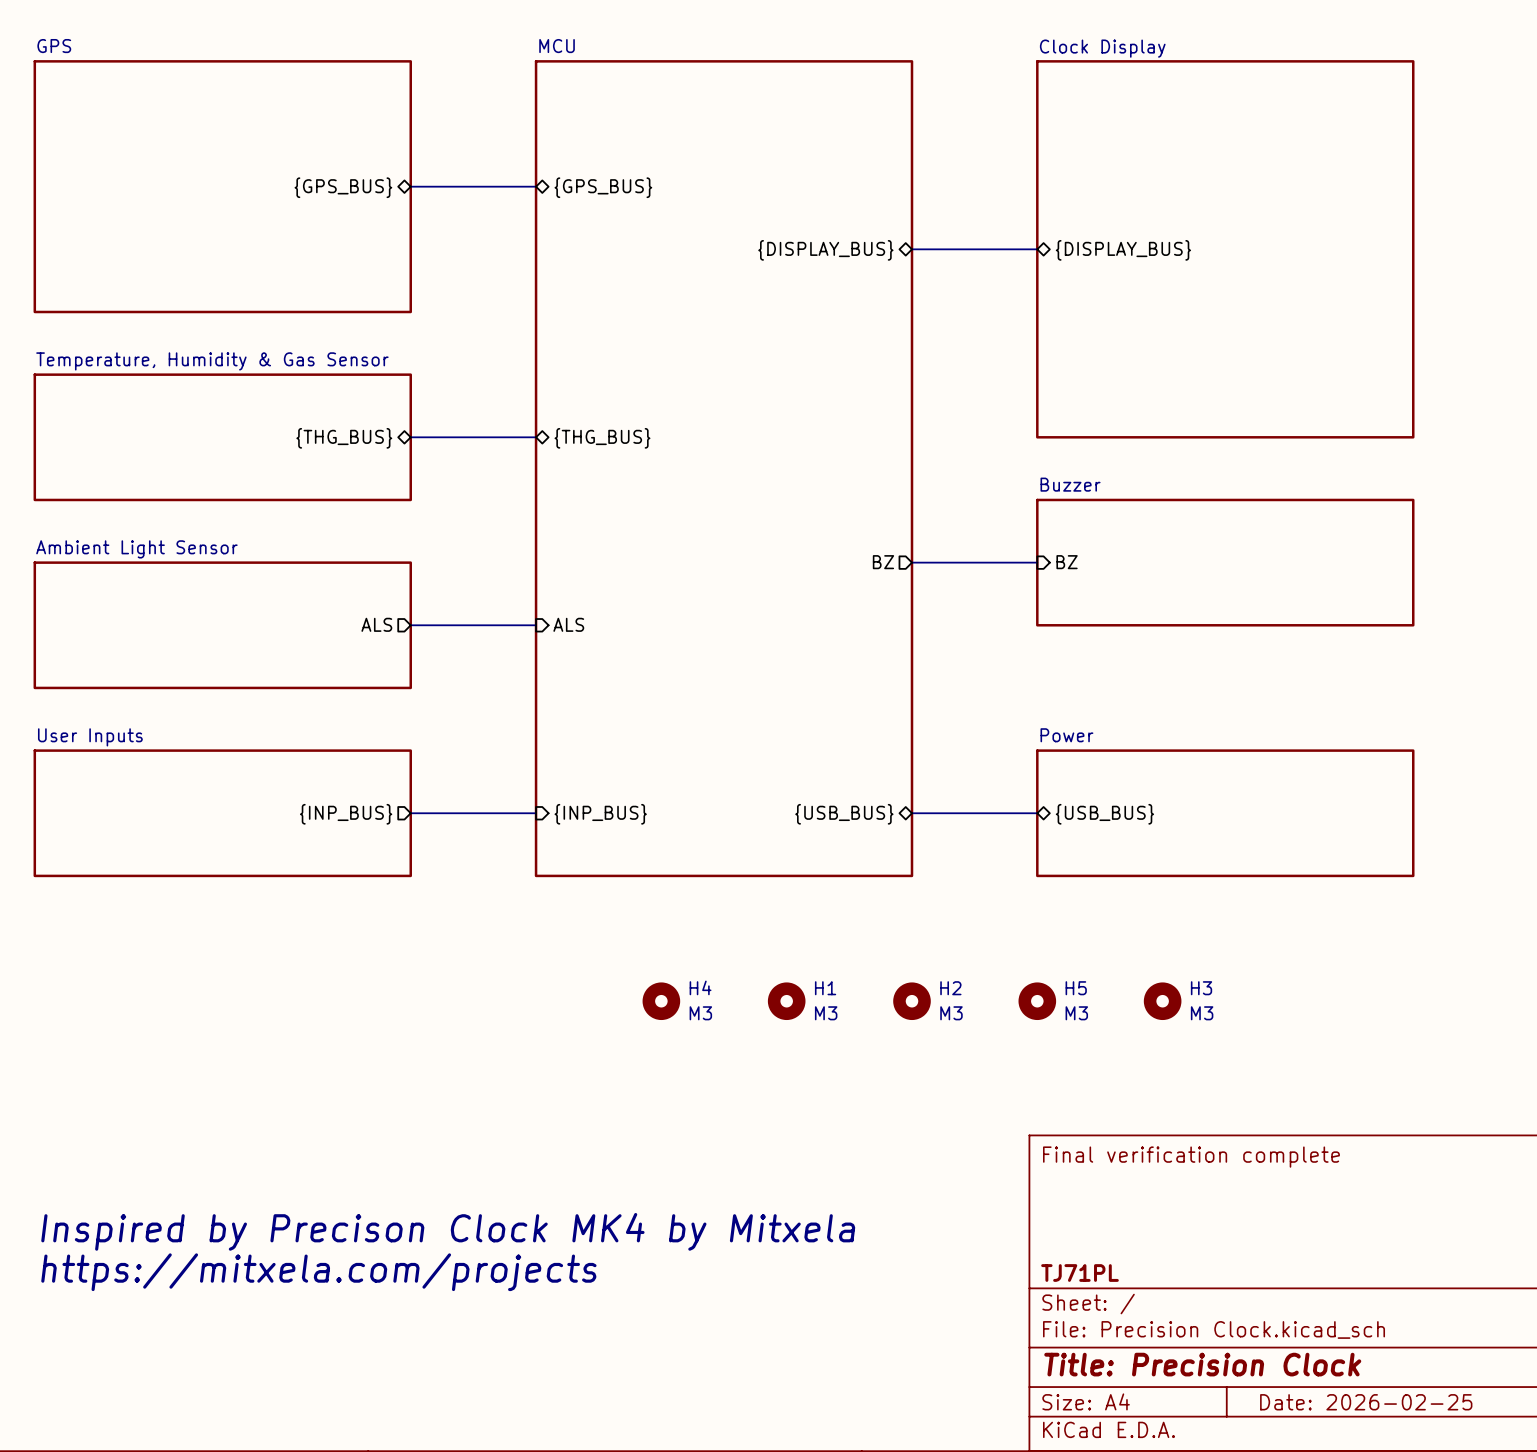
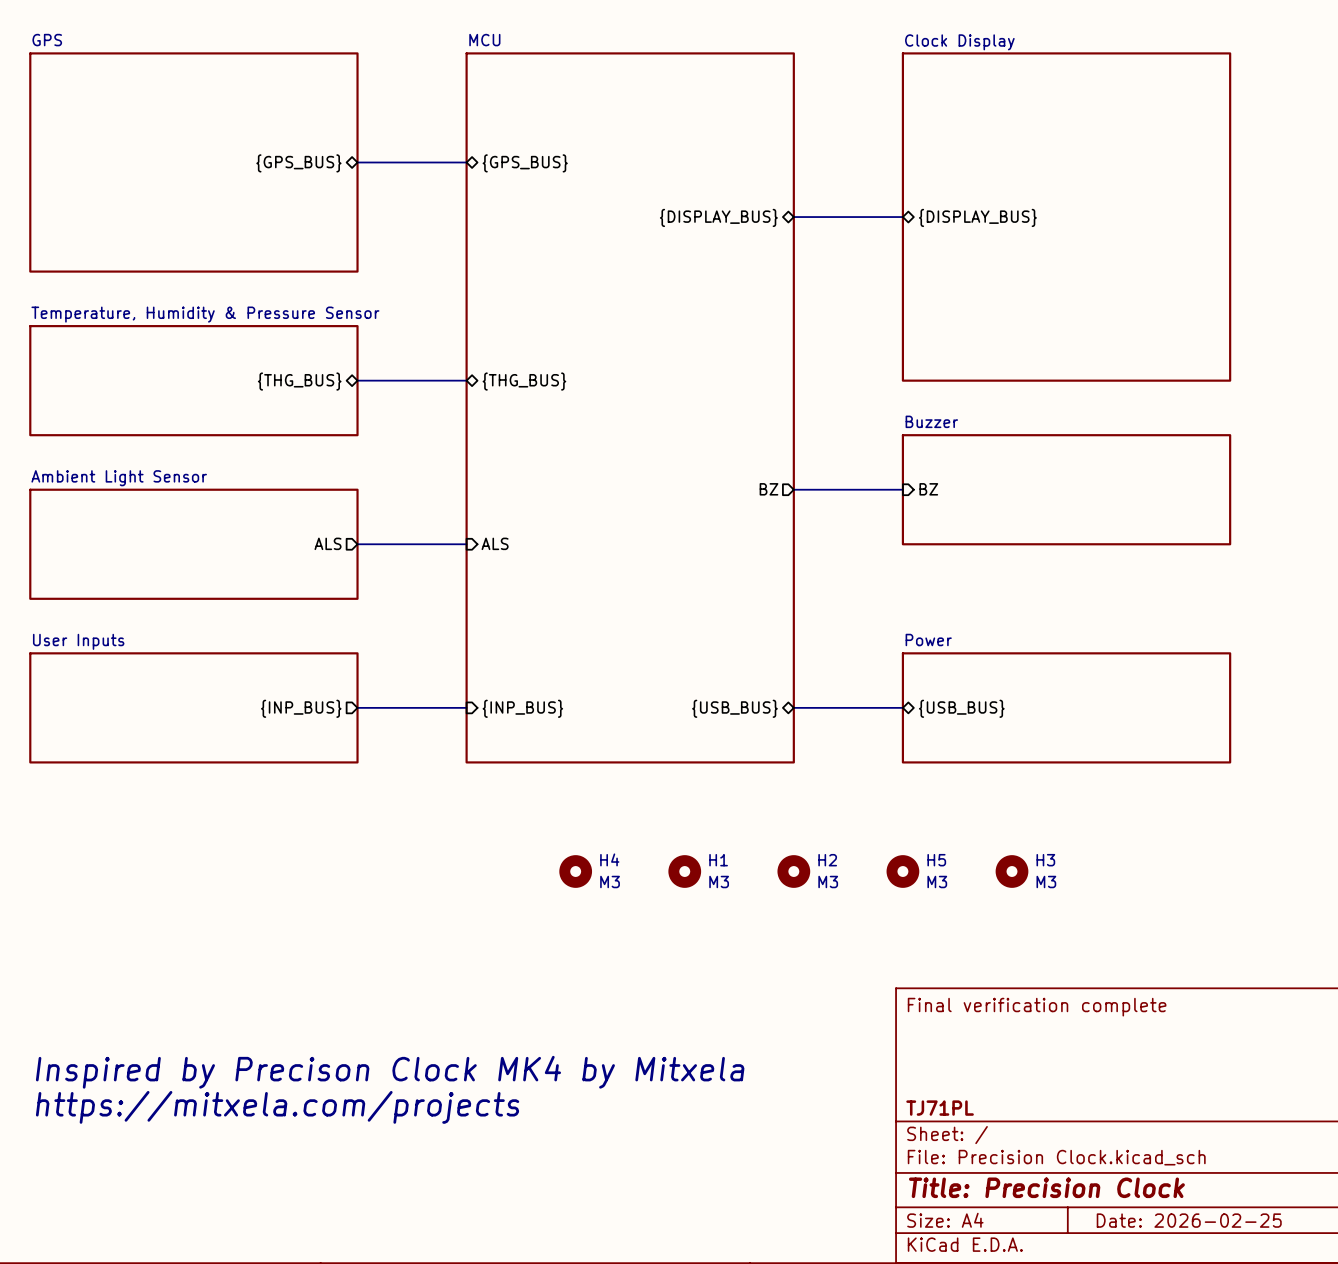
sheet Temperature, Humidity & Gas Sensor name: Temperature, Humidity & Gas Sensor (212, 361) -> Temperature, Humidity & Pressure Sensor (205, 314)

